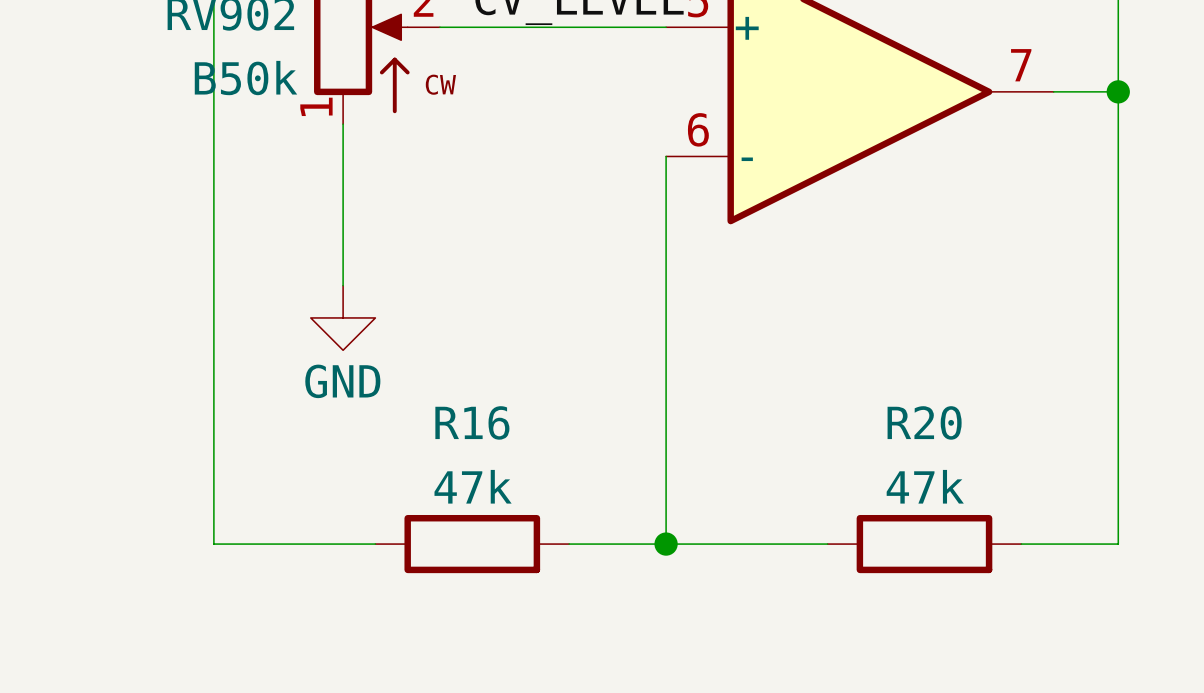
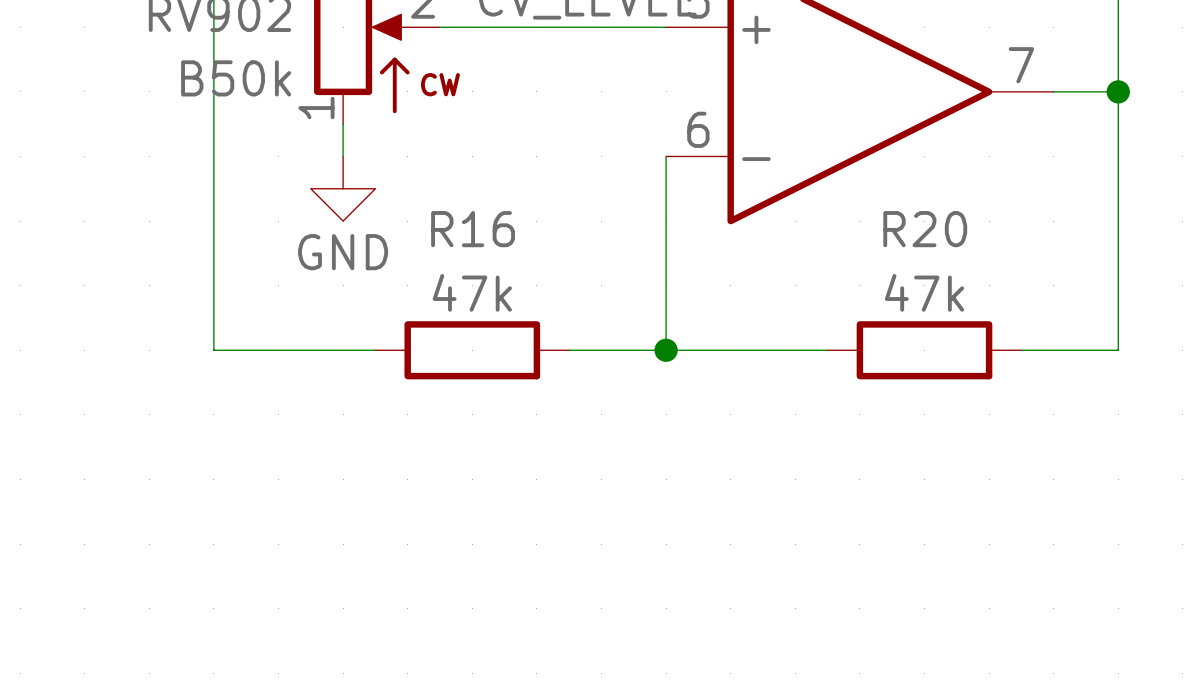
wire: (343, 156) (343, 285) -> none
power symbol position: GND (343, 317) -> GND (343, 188)
wire: (213, 350) (213, 544) (375, 544) -> (213, 350) (375, 350)
wire: (666, 350) (666, 544) -> none
junction: none -> (666, 350)
wire: (1118, 350) (1118, 544) (1021, 544) -> (1118, 350) (1021, 350)
R16 position: (472, 544) -> (472, 350)
wire: (569, 544) (827, 544) -> (569, 350) (827, 350)
junction: (666, 544) -> none
R20 position: (924, 544) -> (924, 350)

